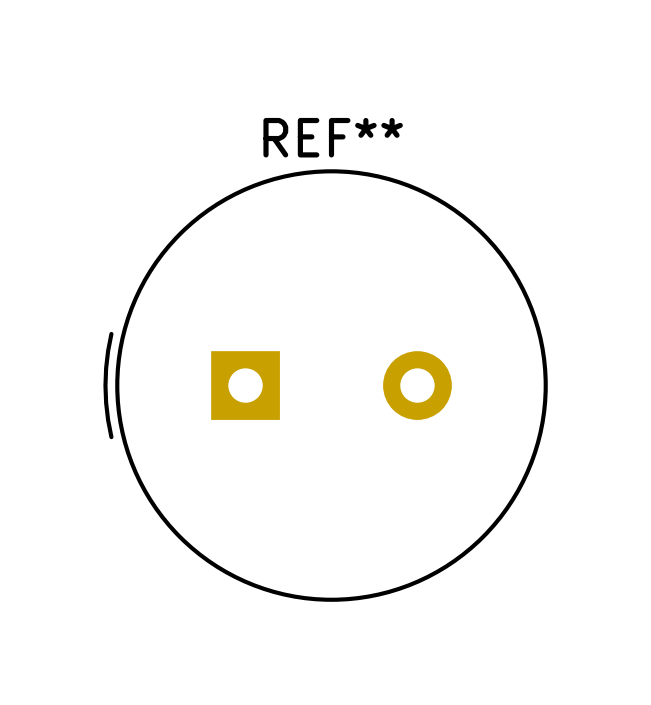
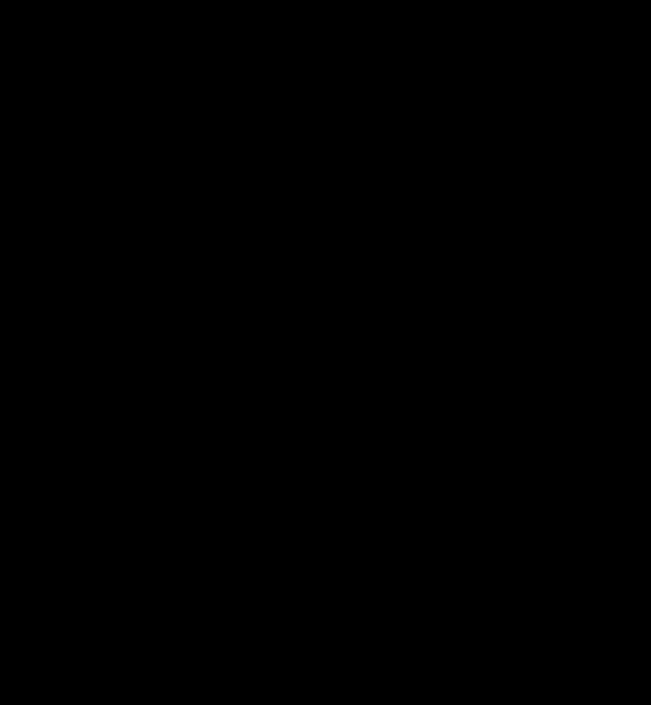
REF**: (325, 385) -> none

